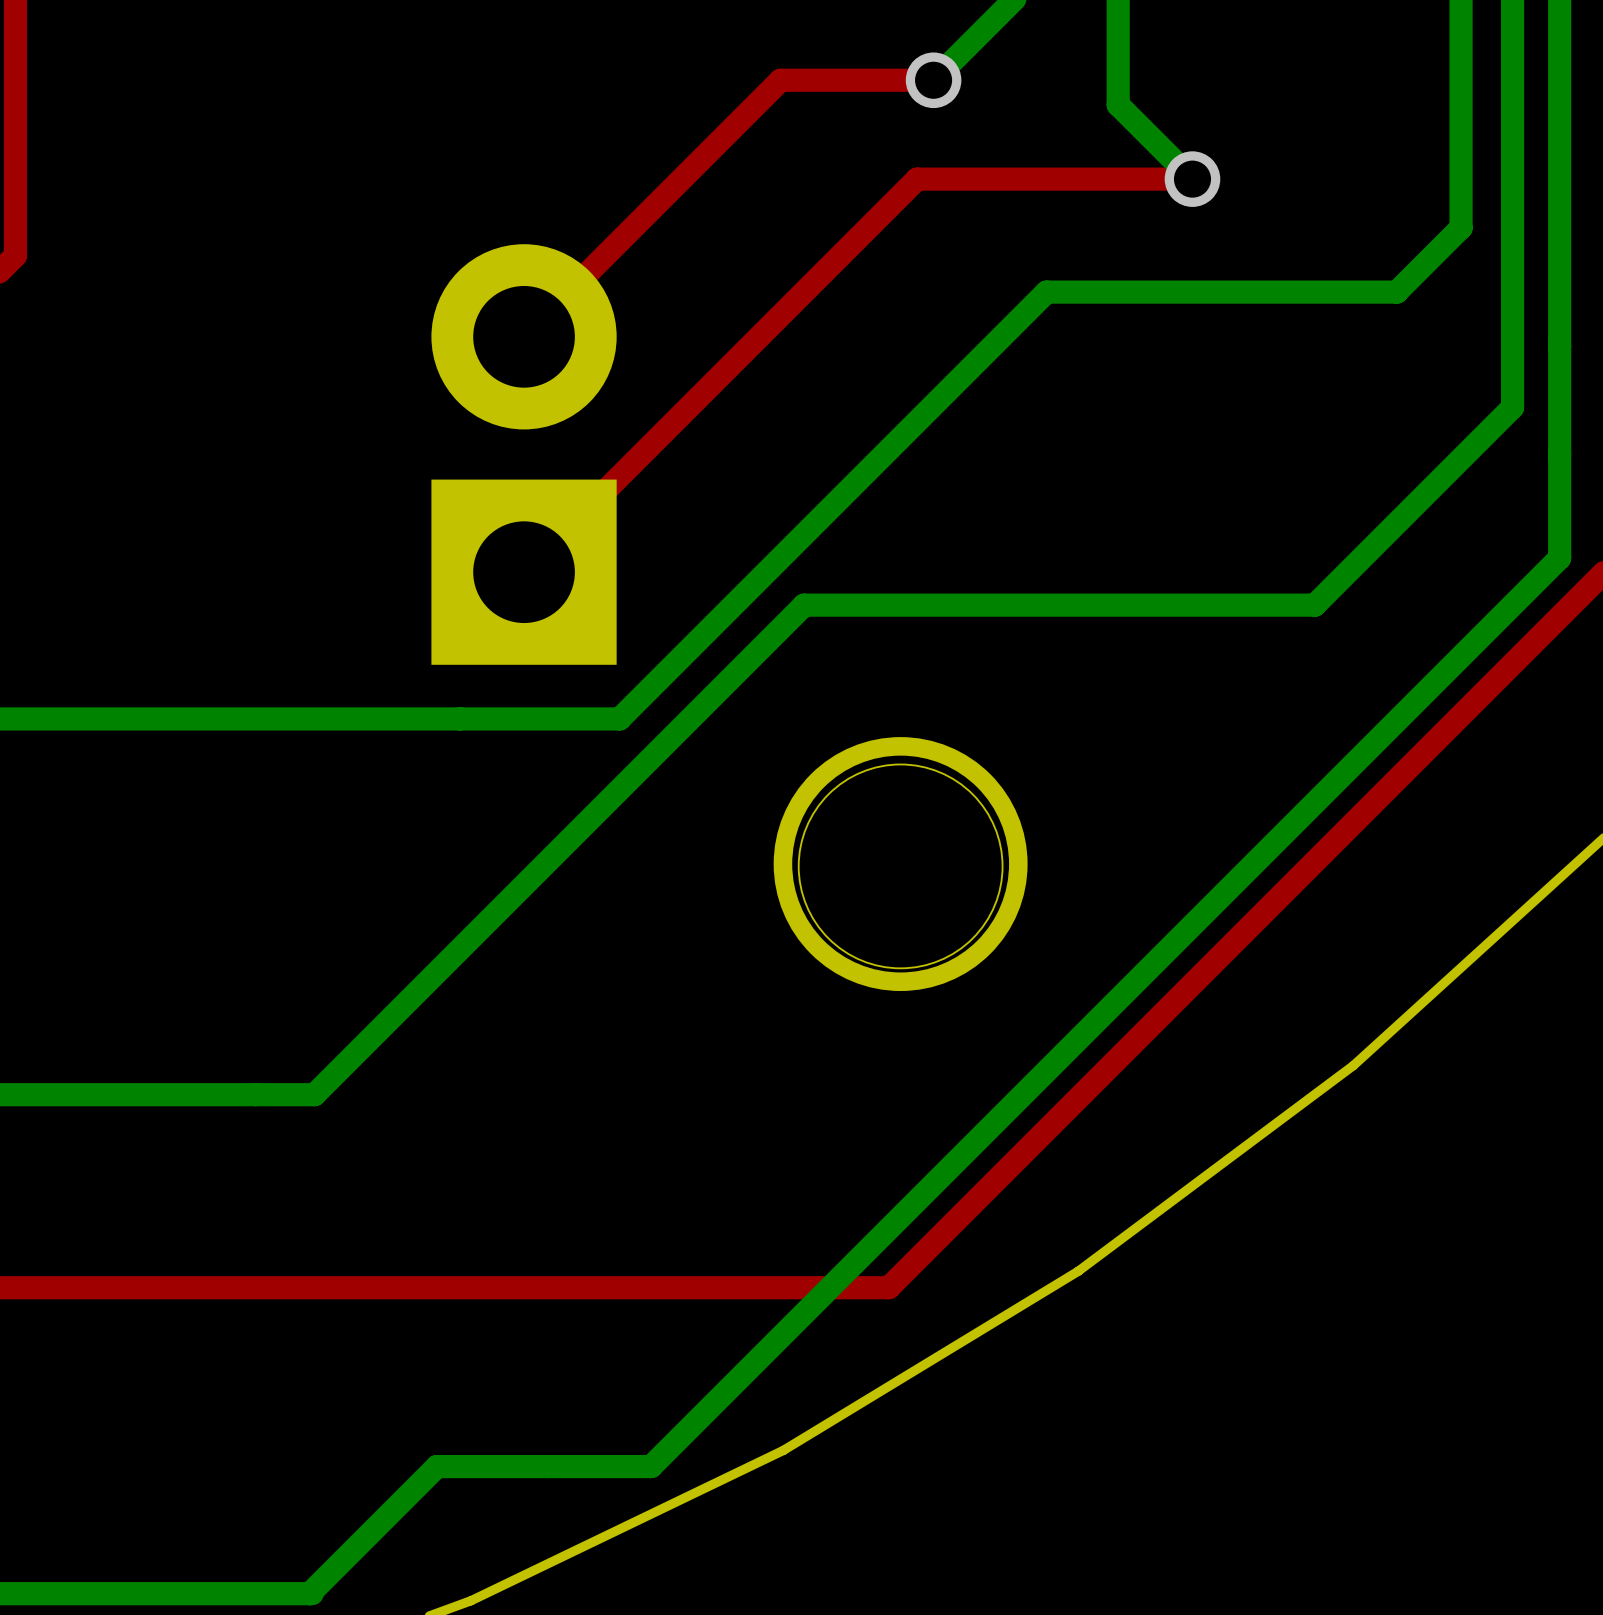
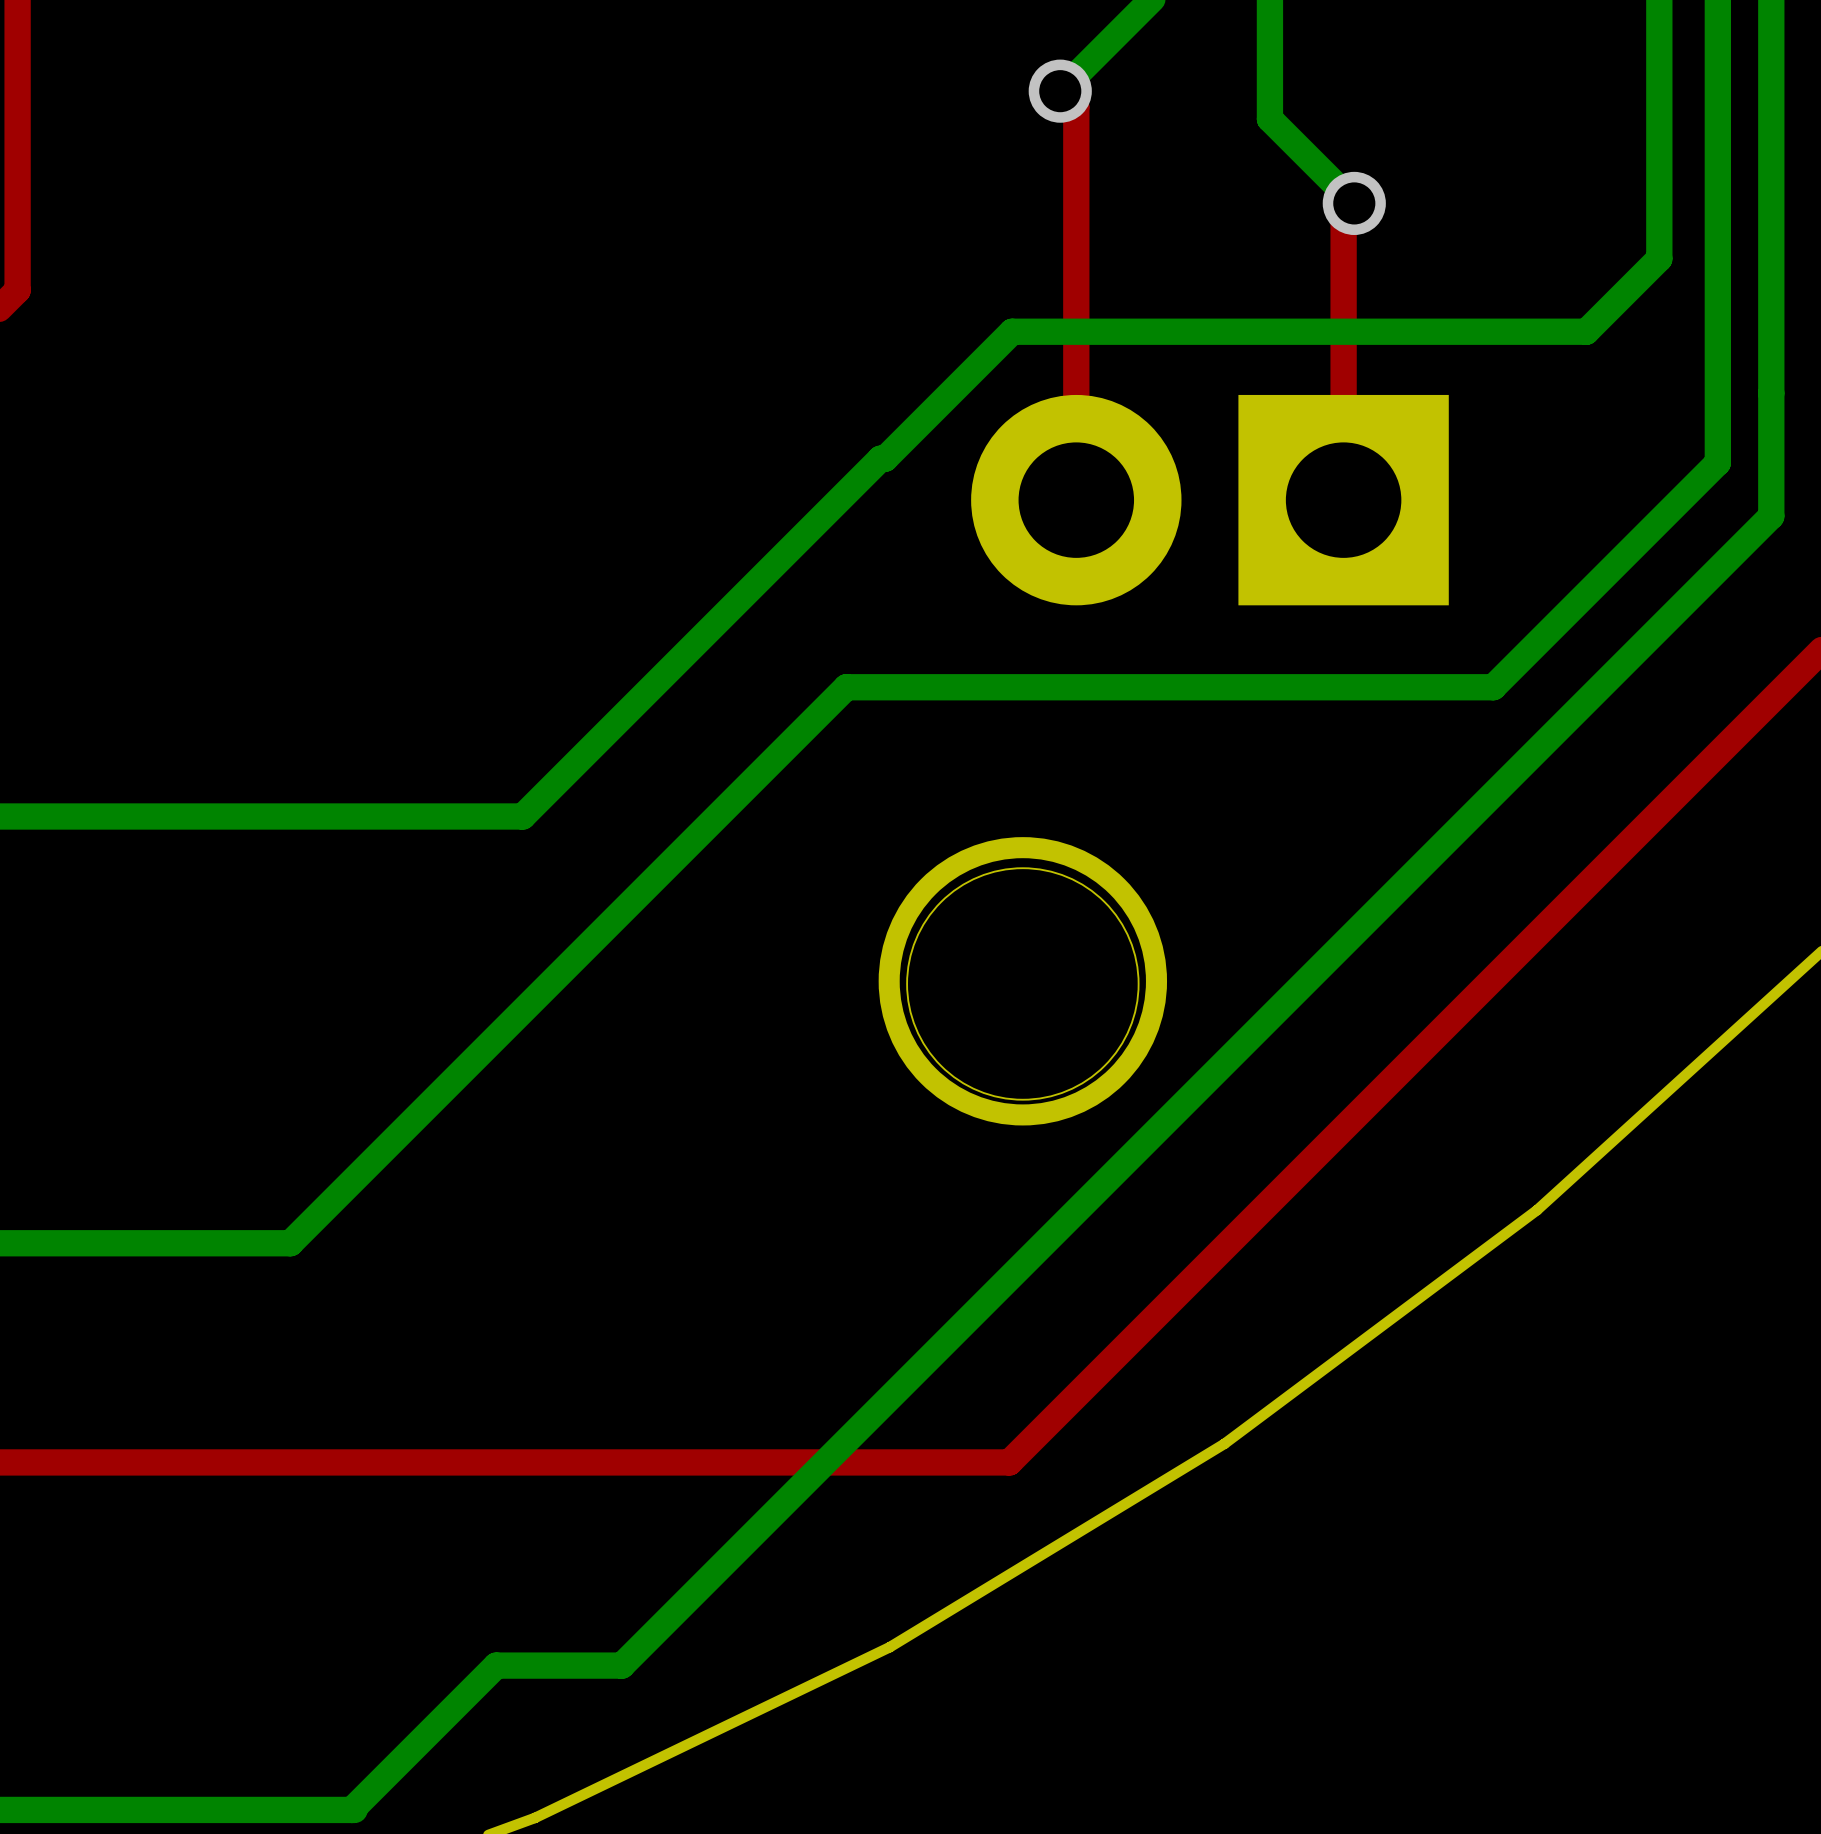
top track: (933, 80) (780, 80) (524, 336) -> (1060, 91) (1076, 107) (1076, 500)
top track: (1192, 179) (917, 179) (524, 572) -> (1354, 203) (1343, 214) (1343, 500)
bottom track: (1046, 292) (619, 718) (460, 718) -> (1188, 331) (1012, 331) (885, 458) (880, 458) (522, 816)
part rotation: 0° (524, 454) -> 90° counterclockwise (1209, 500)
part position: (524, 454) -> (1209, 500)
bottom track: (1559, 454) (1559, 558) (651, 1466) (547, 1466) -> (1771, 516) (621, 1665)
bottom track: (804, 605) (314, 1094) (255, 1094) -> (913, 687) (846, 687) (290, 1243)

